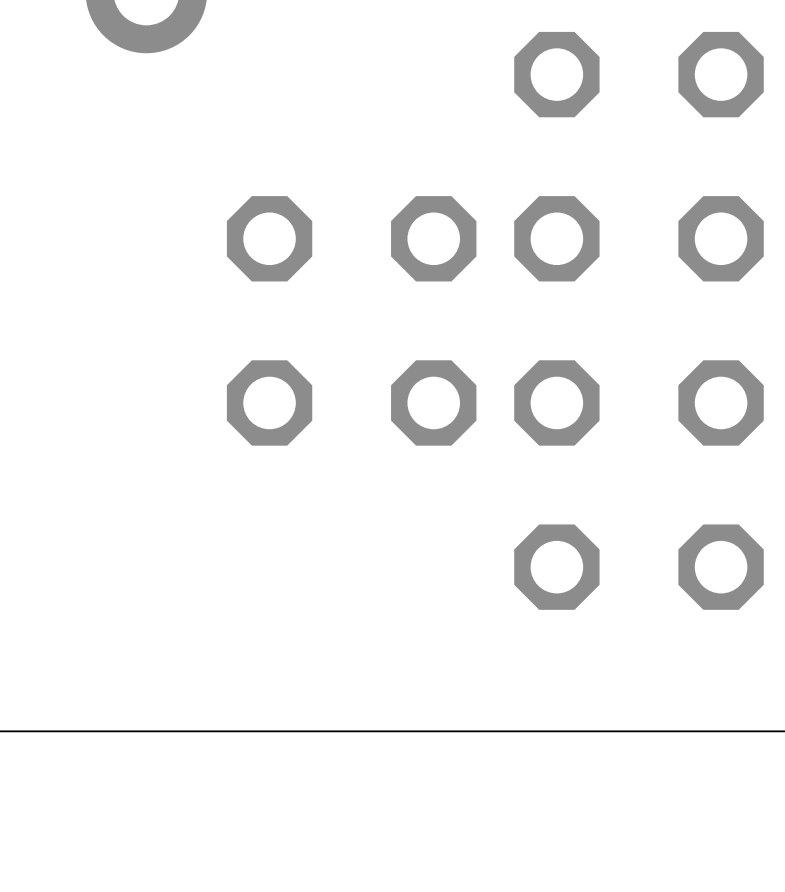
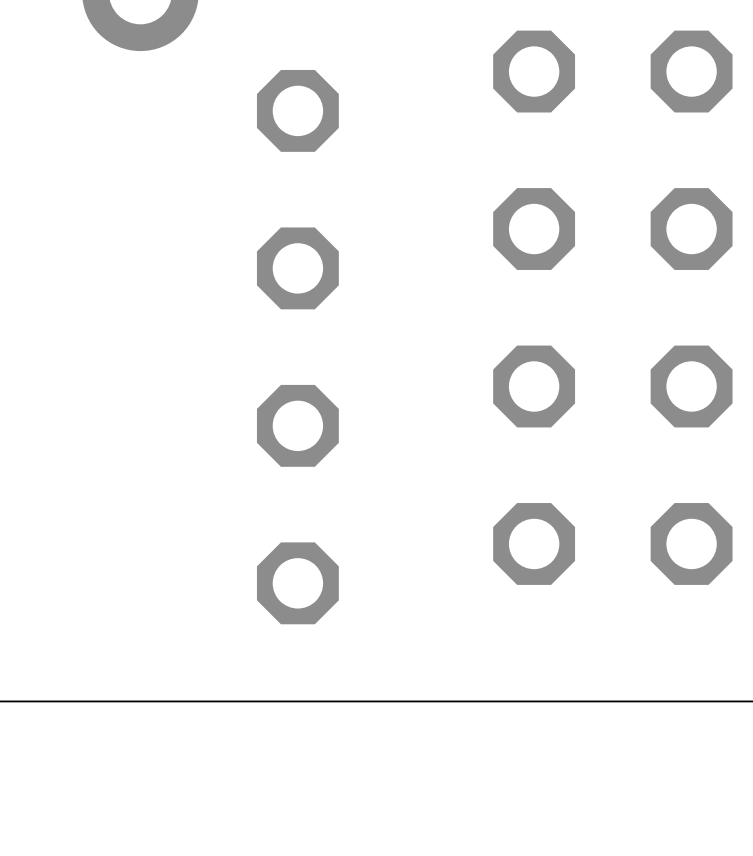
part rotation: 0° (351, 238) -> 90° clockwise (297, 189)
part rotation: 0° (351, 402) -> 90° clockwise (297, 504)

